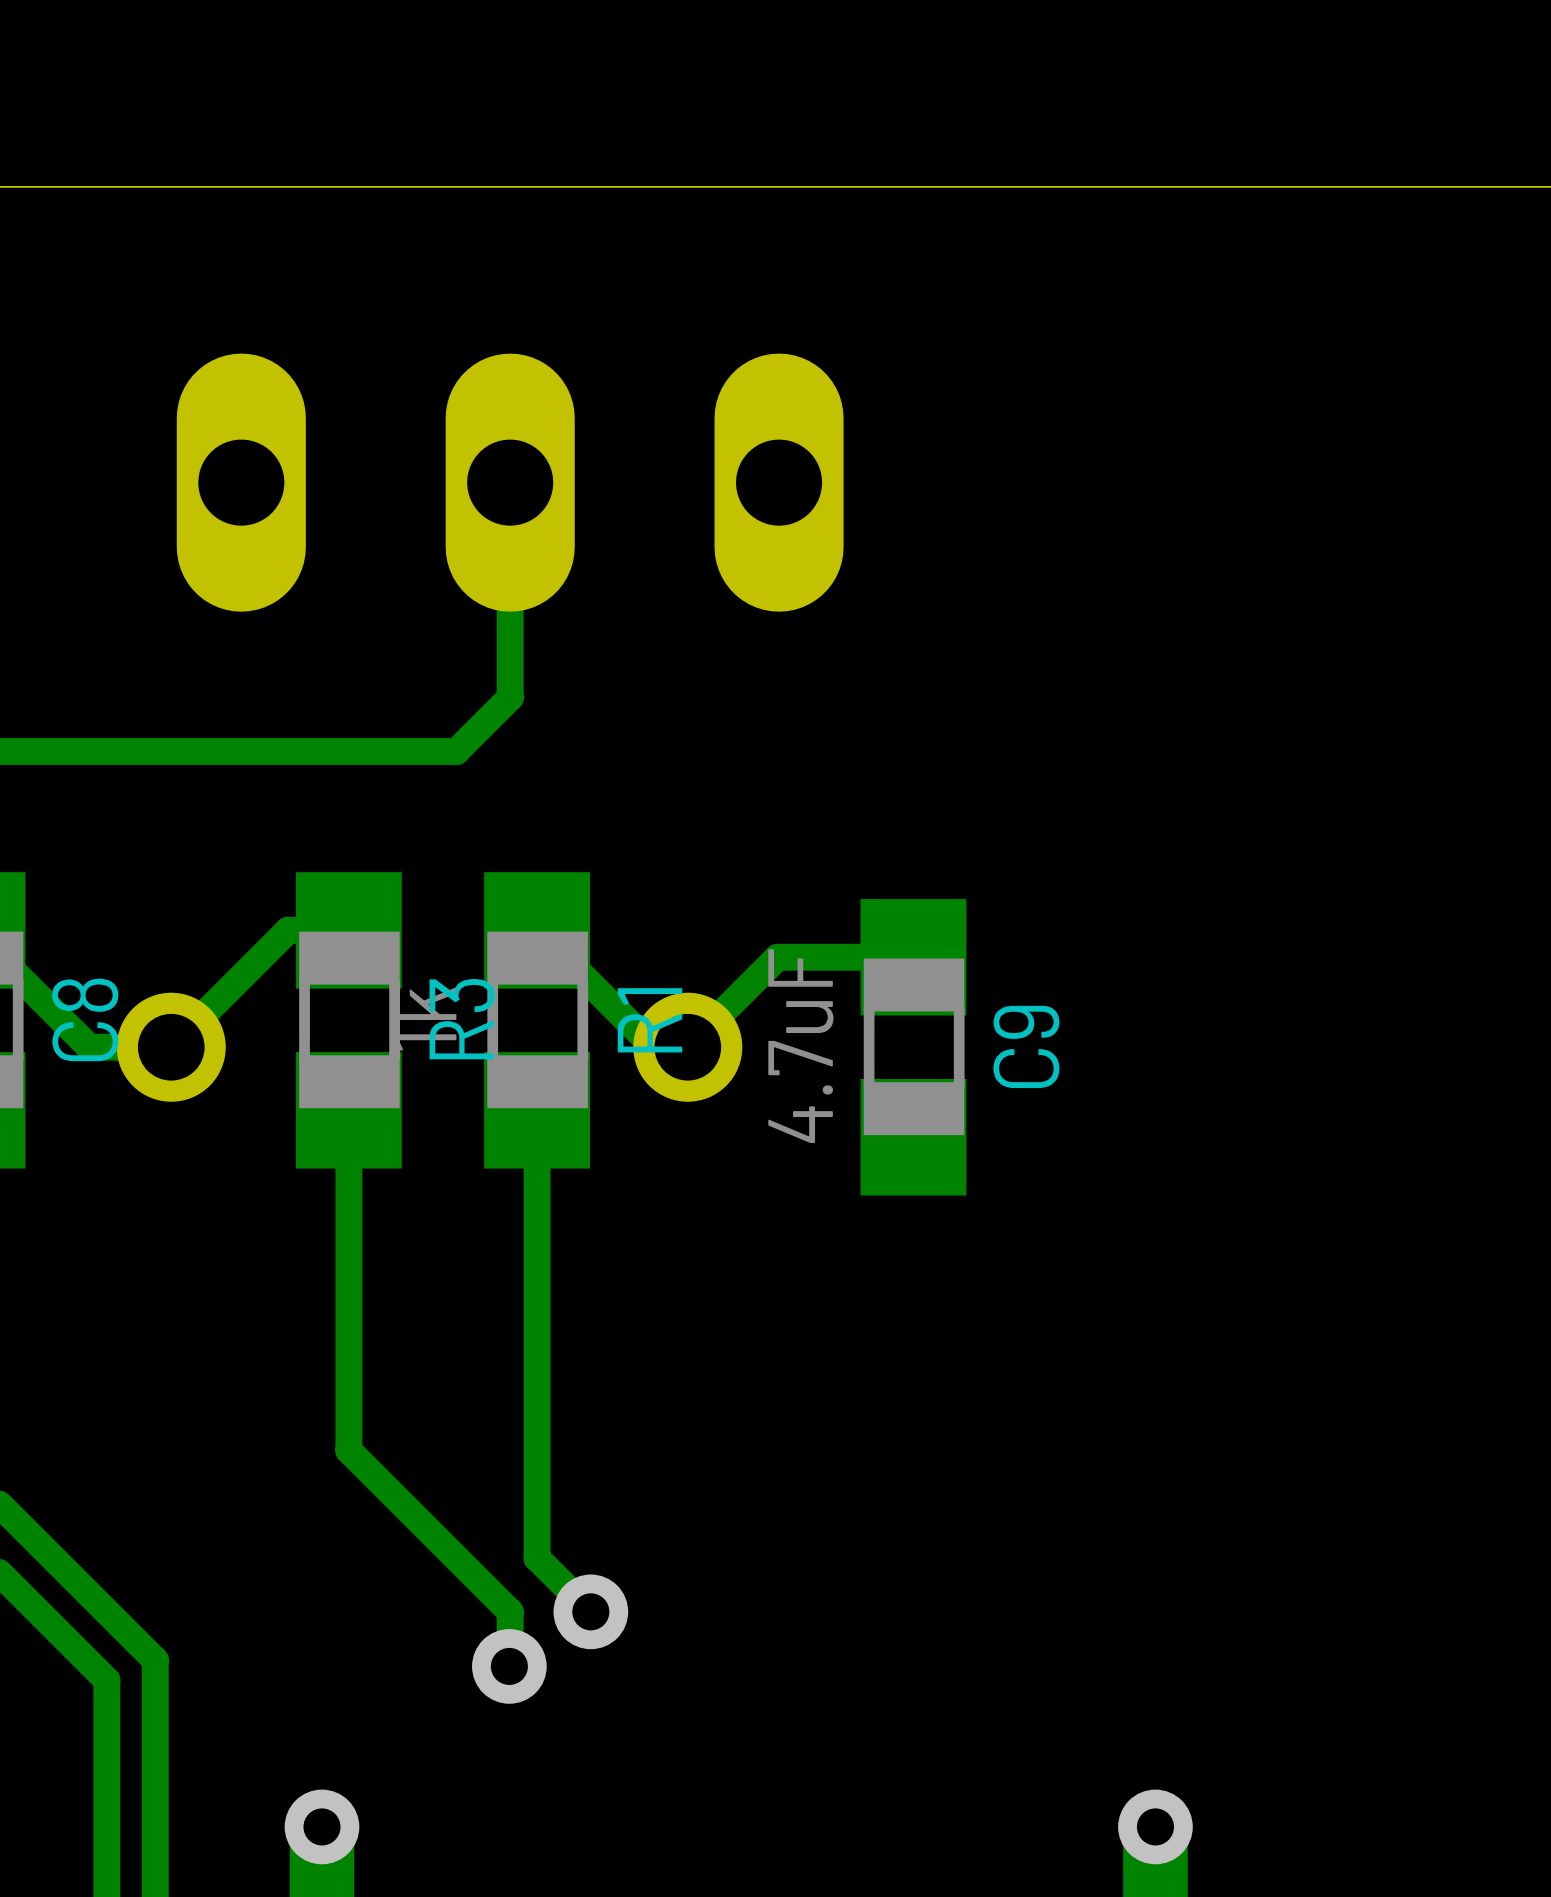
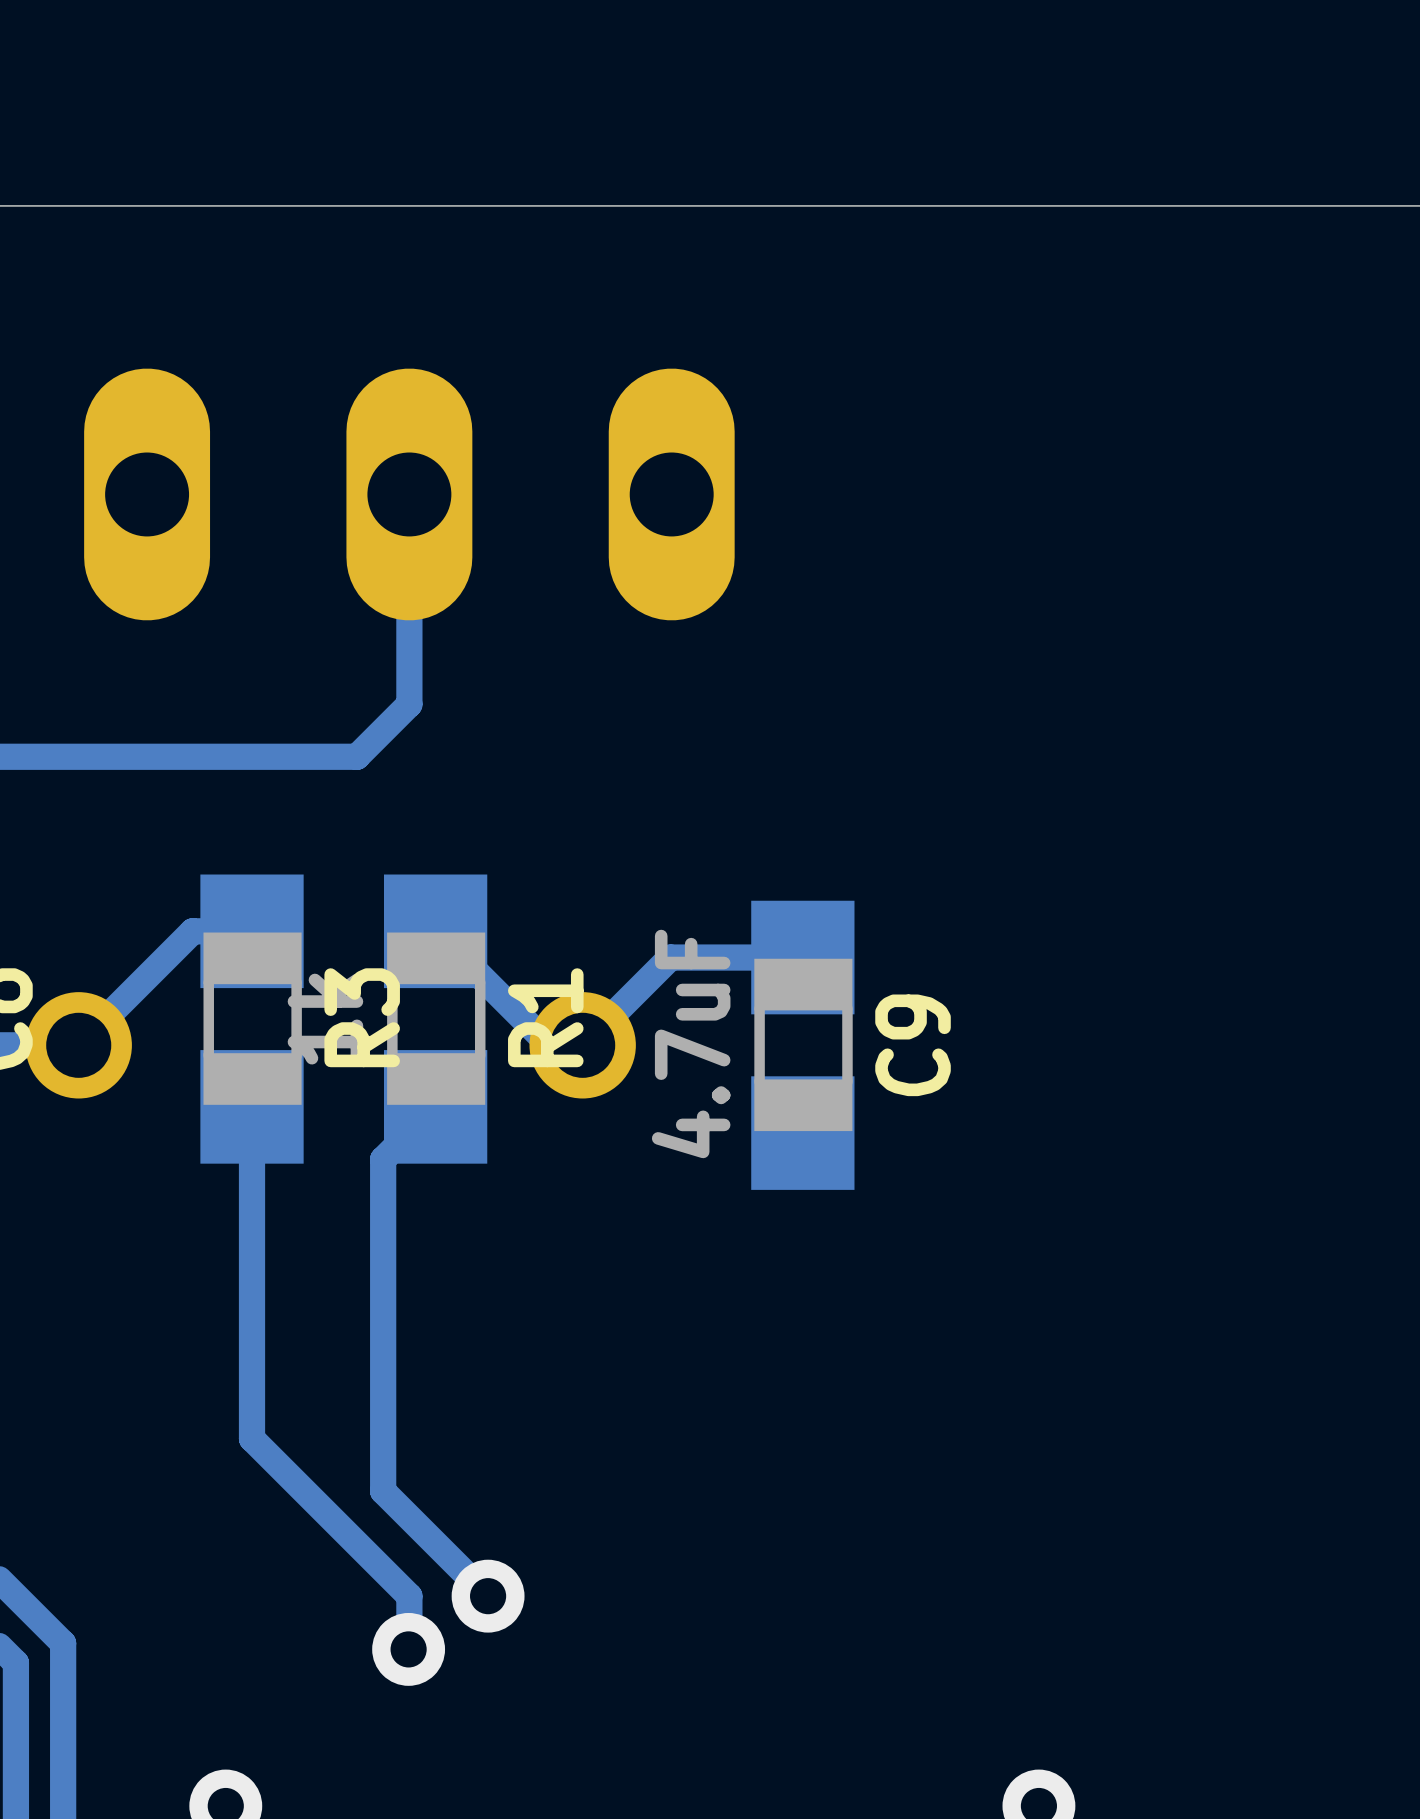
track: (537, 1110) (537, 1558) -> (435, 1106) (383, 1159) (383, 1491) (435, 1543)

